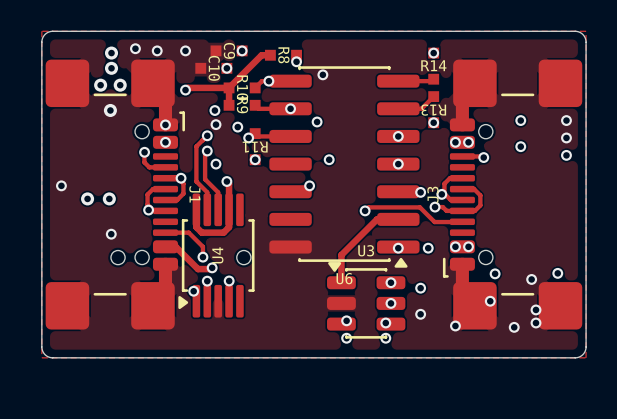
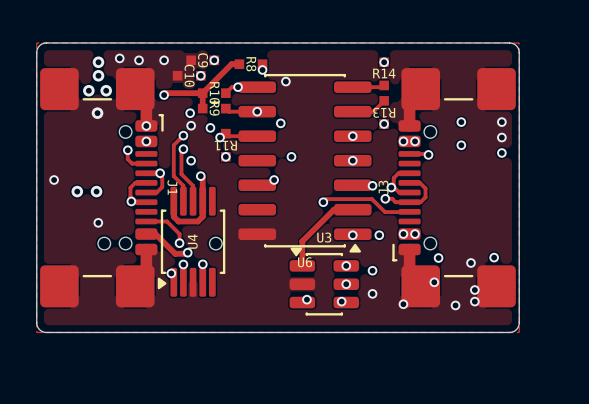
via: (346, 338) -> none
via: (385, 338) -> none

